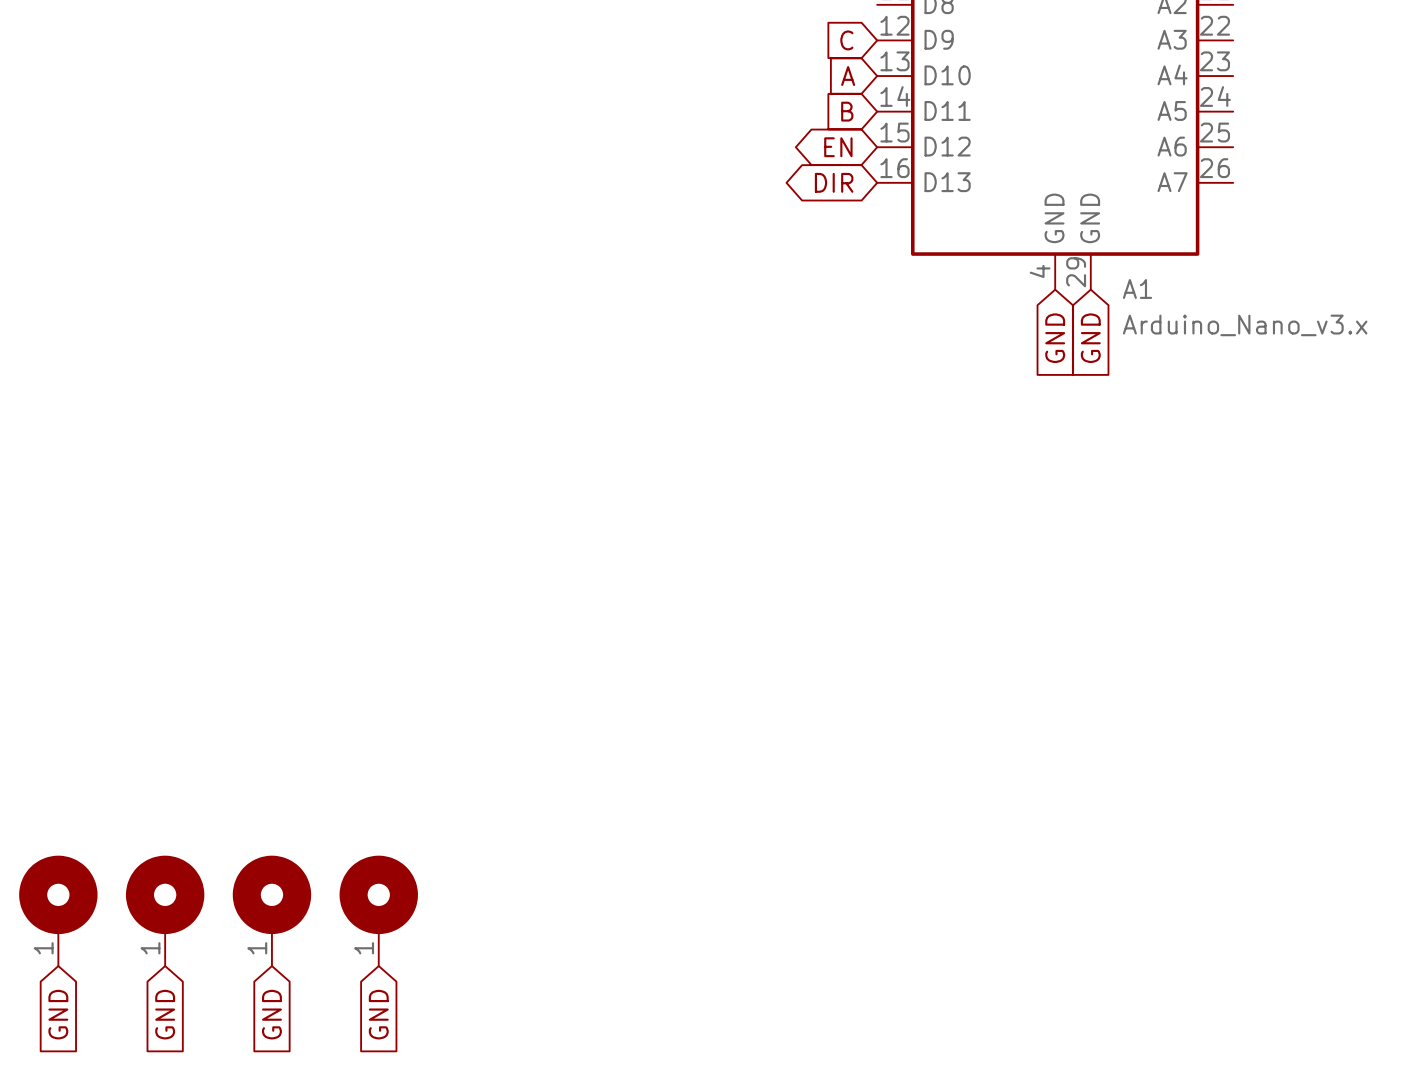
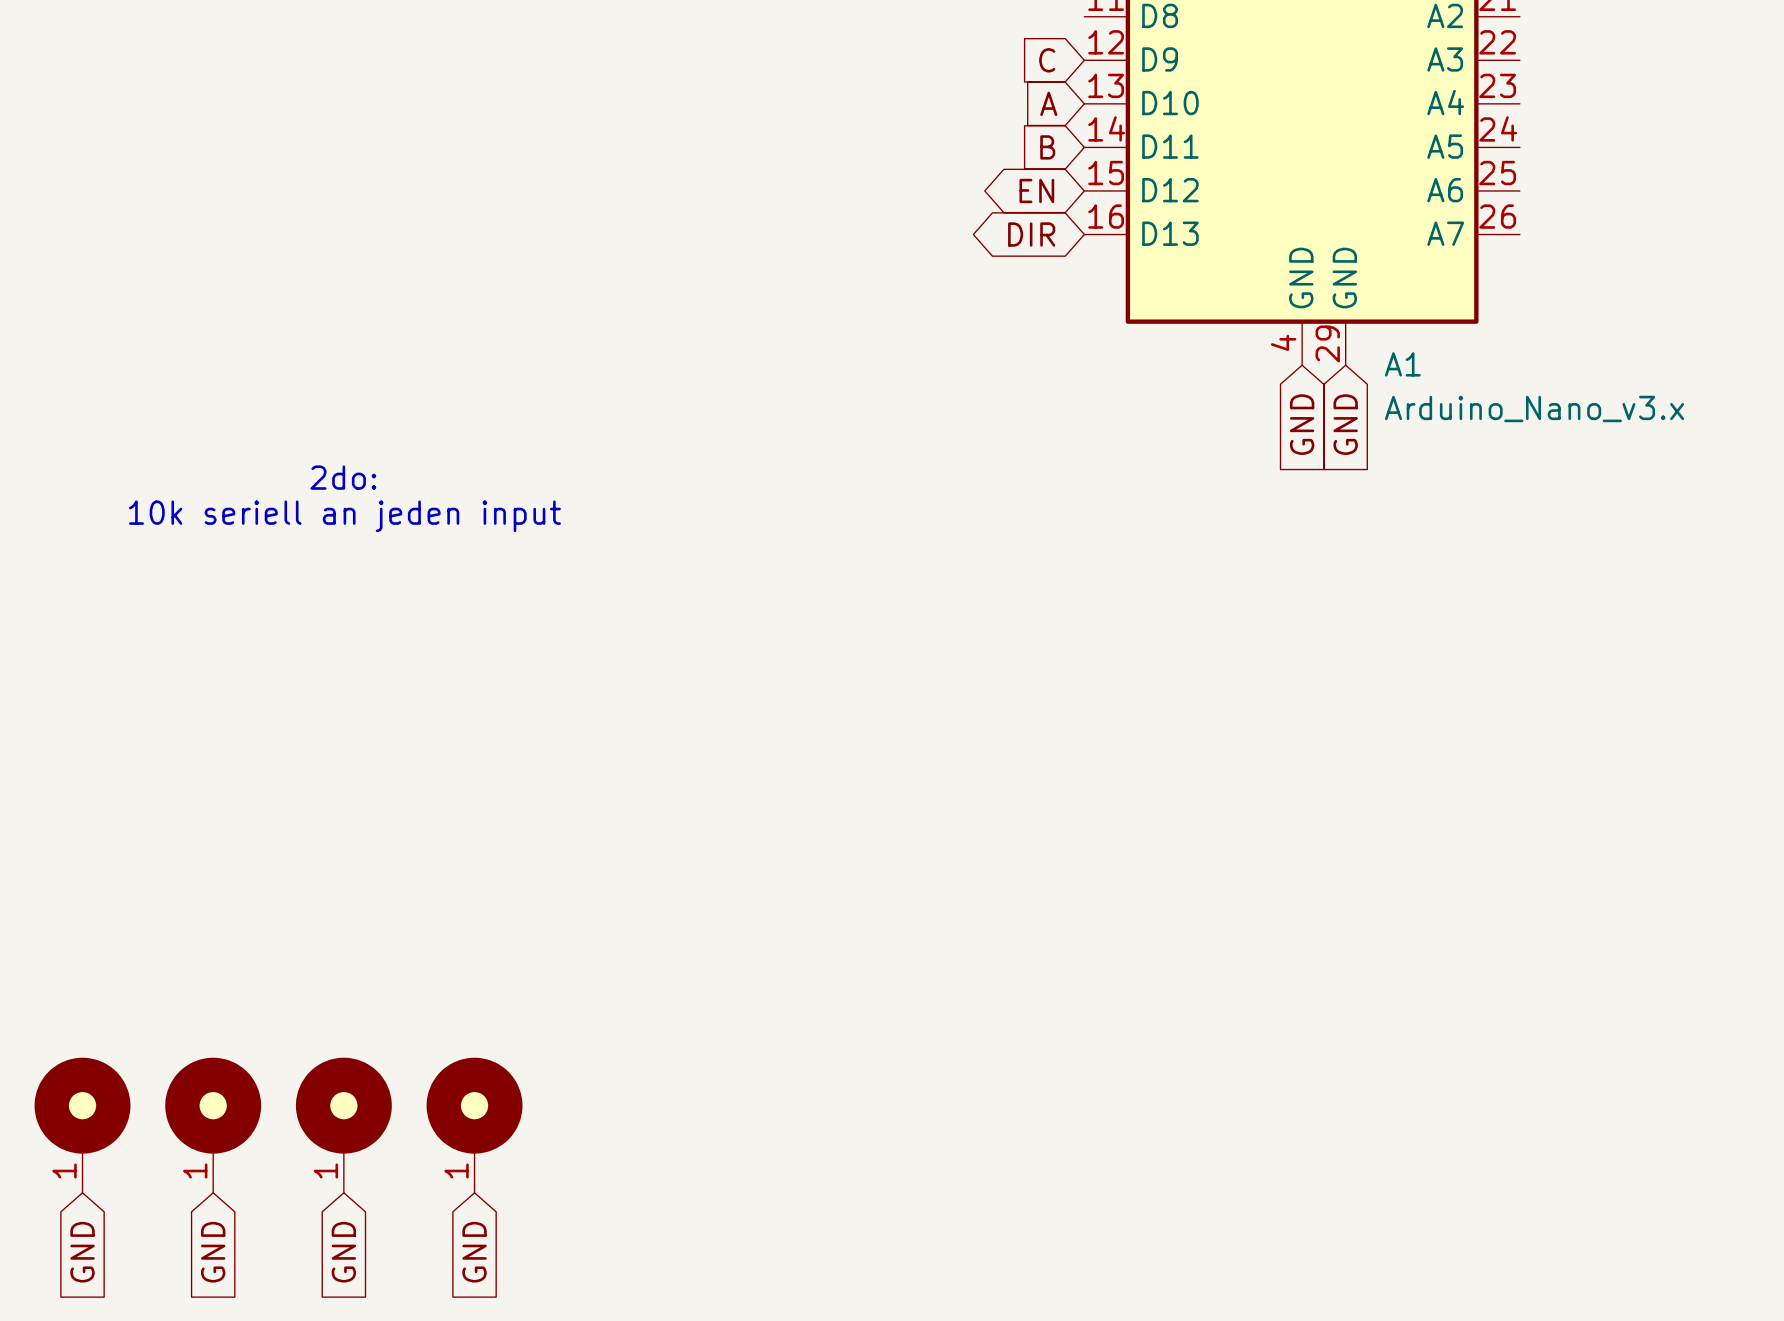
text: none -> 2do: (343, 477)
text: none -> 10k seriell an jeden input (344, 516)

